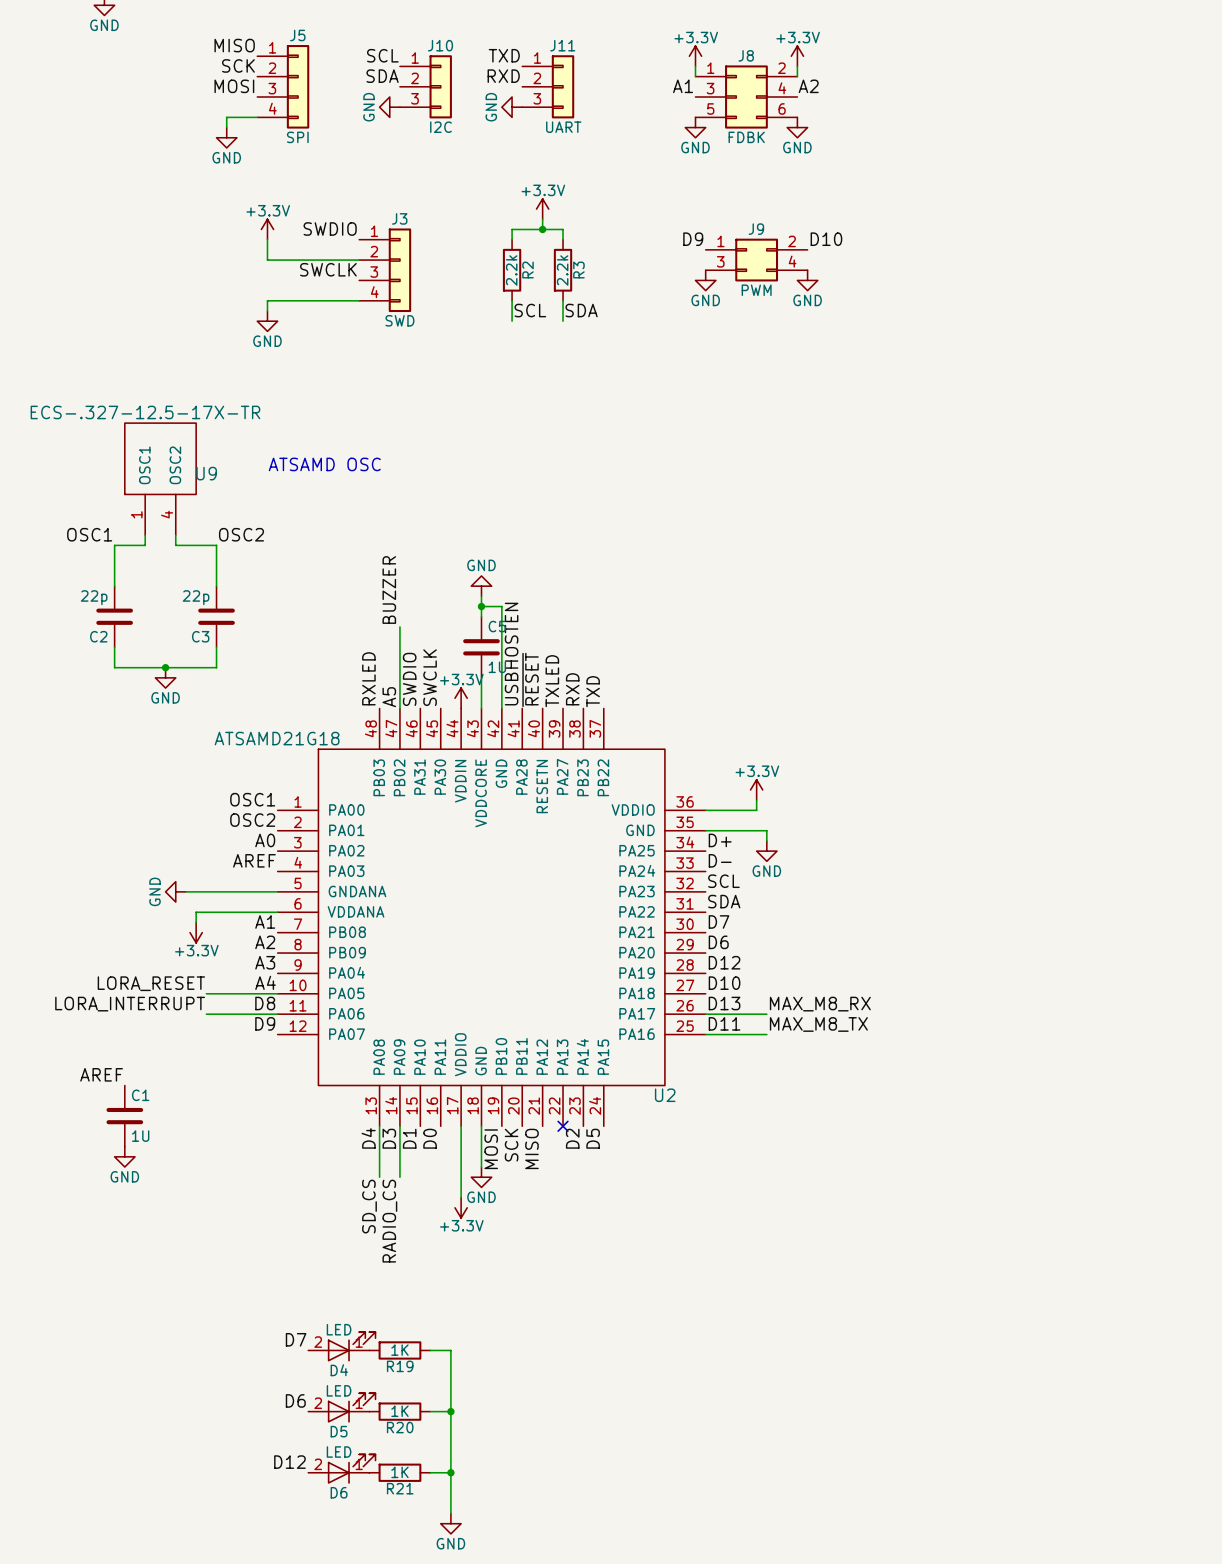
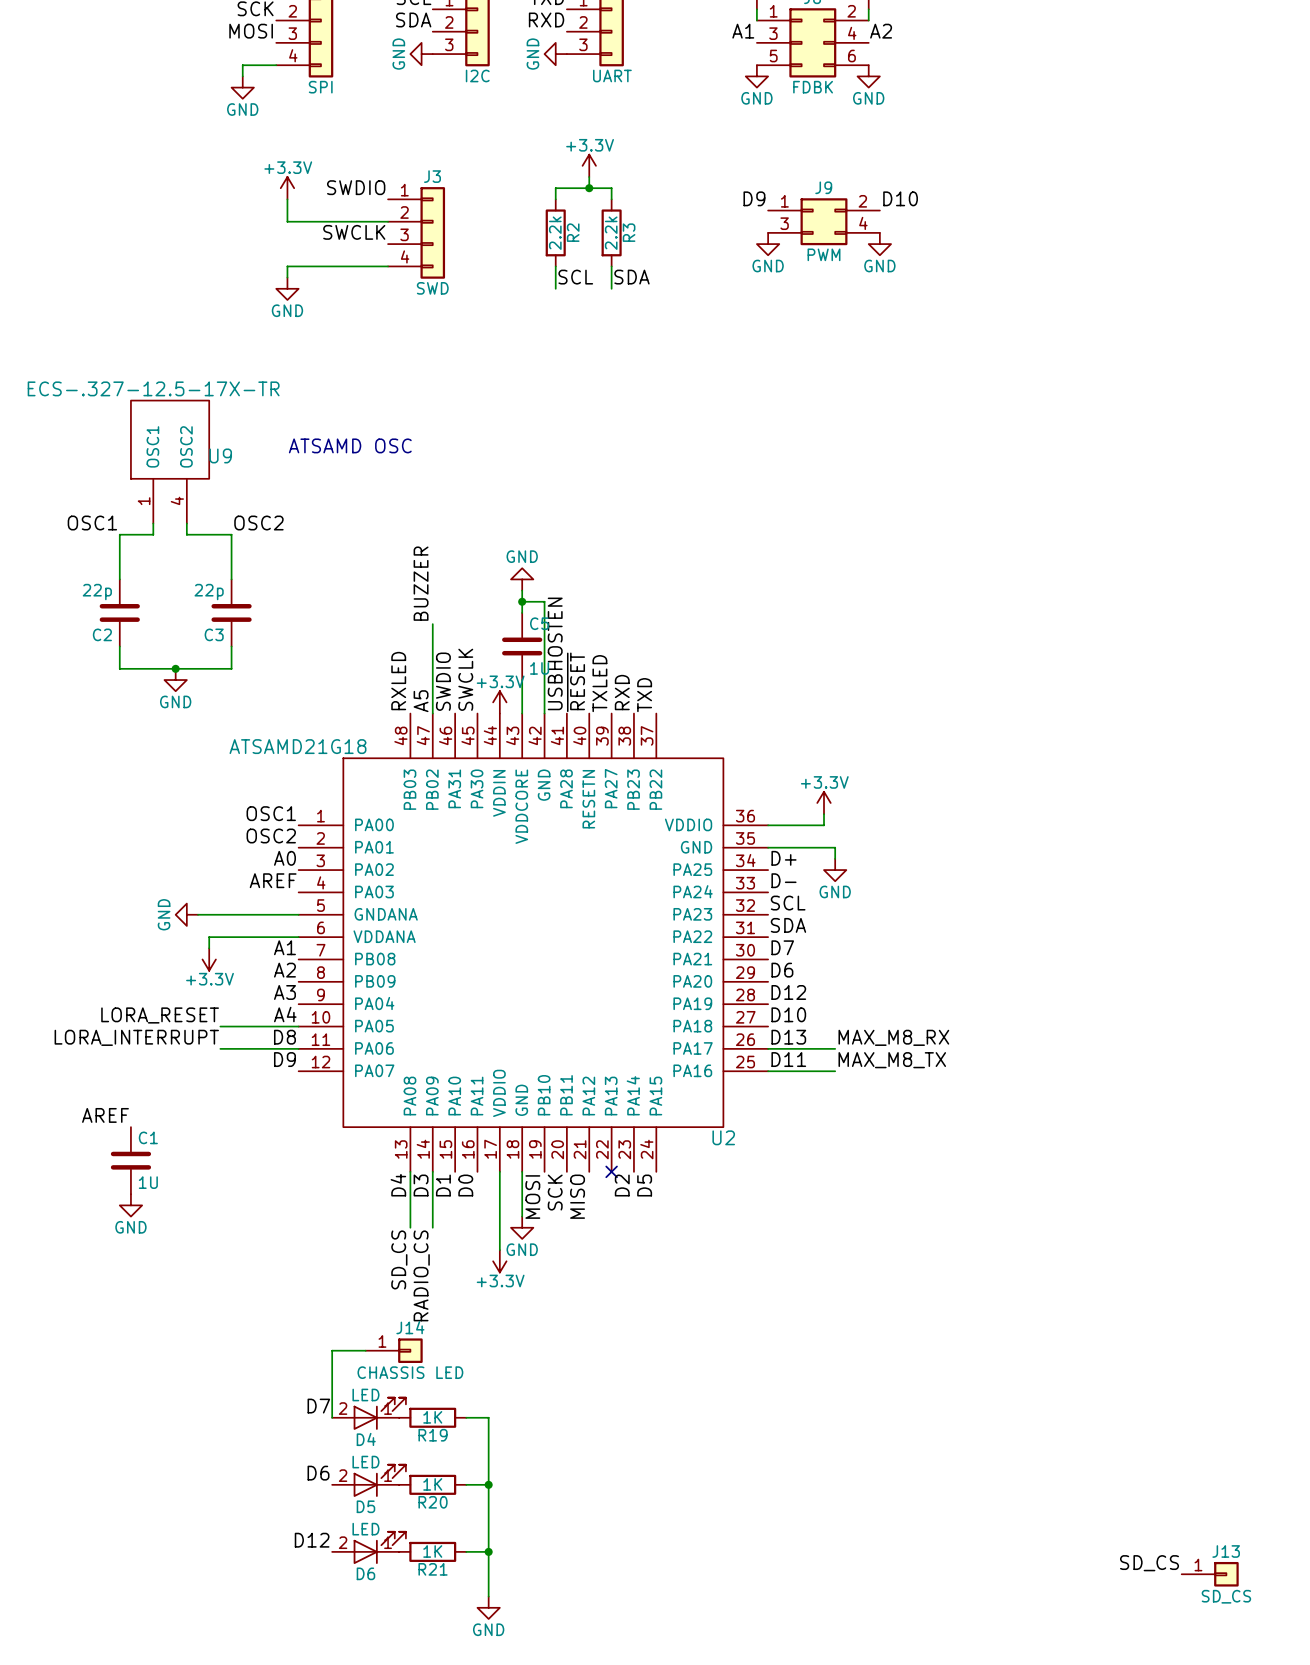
wire: none -> (365, 1350) (332, 1350) (332, 1417)
J14: none -> CHASSIS LED (394, 1350)
label: none -> SD_CS (1149, 1563)
J13: none -> SD_CS (1210, 1574)

